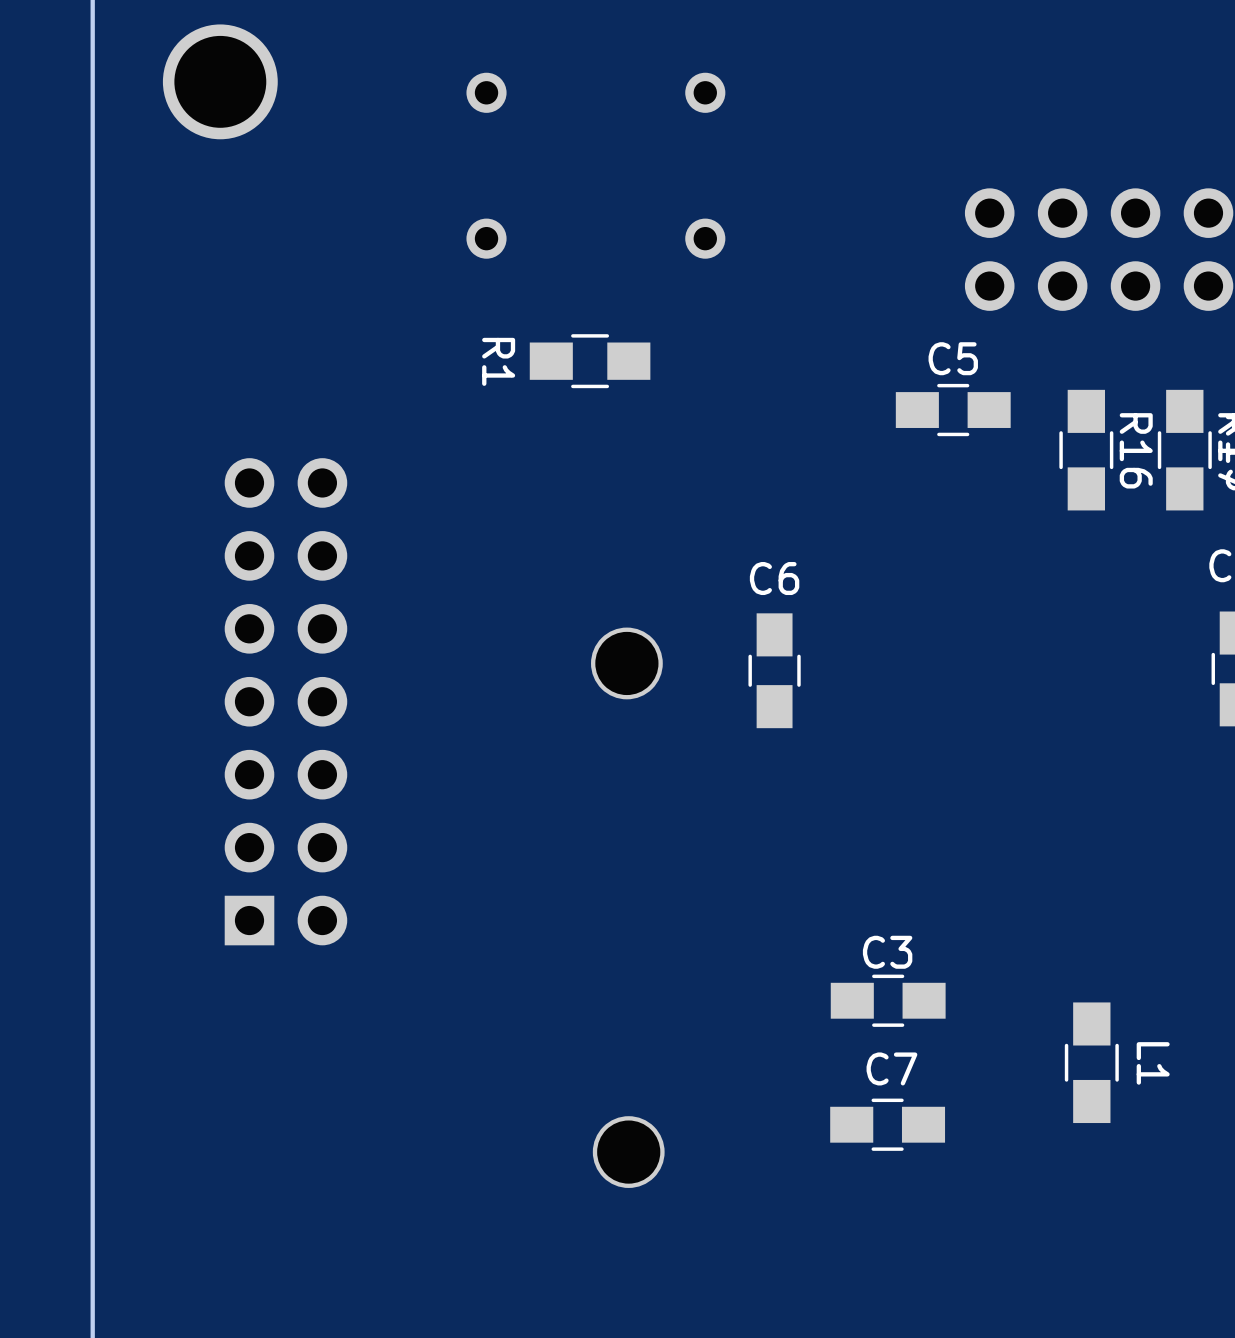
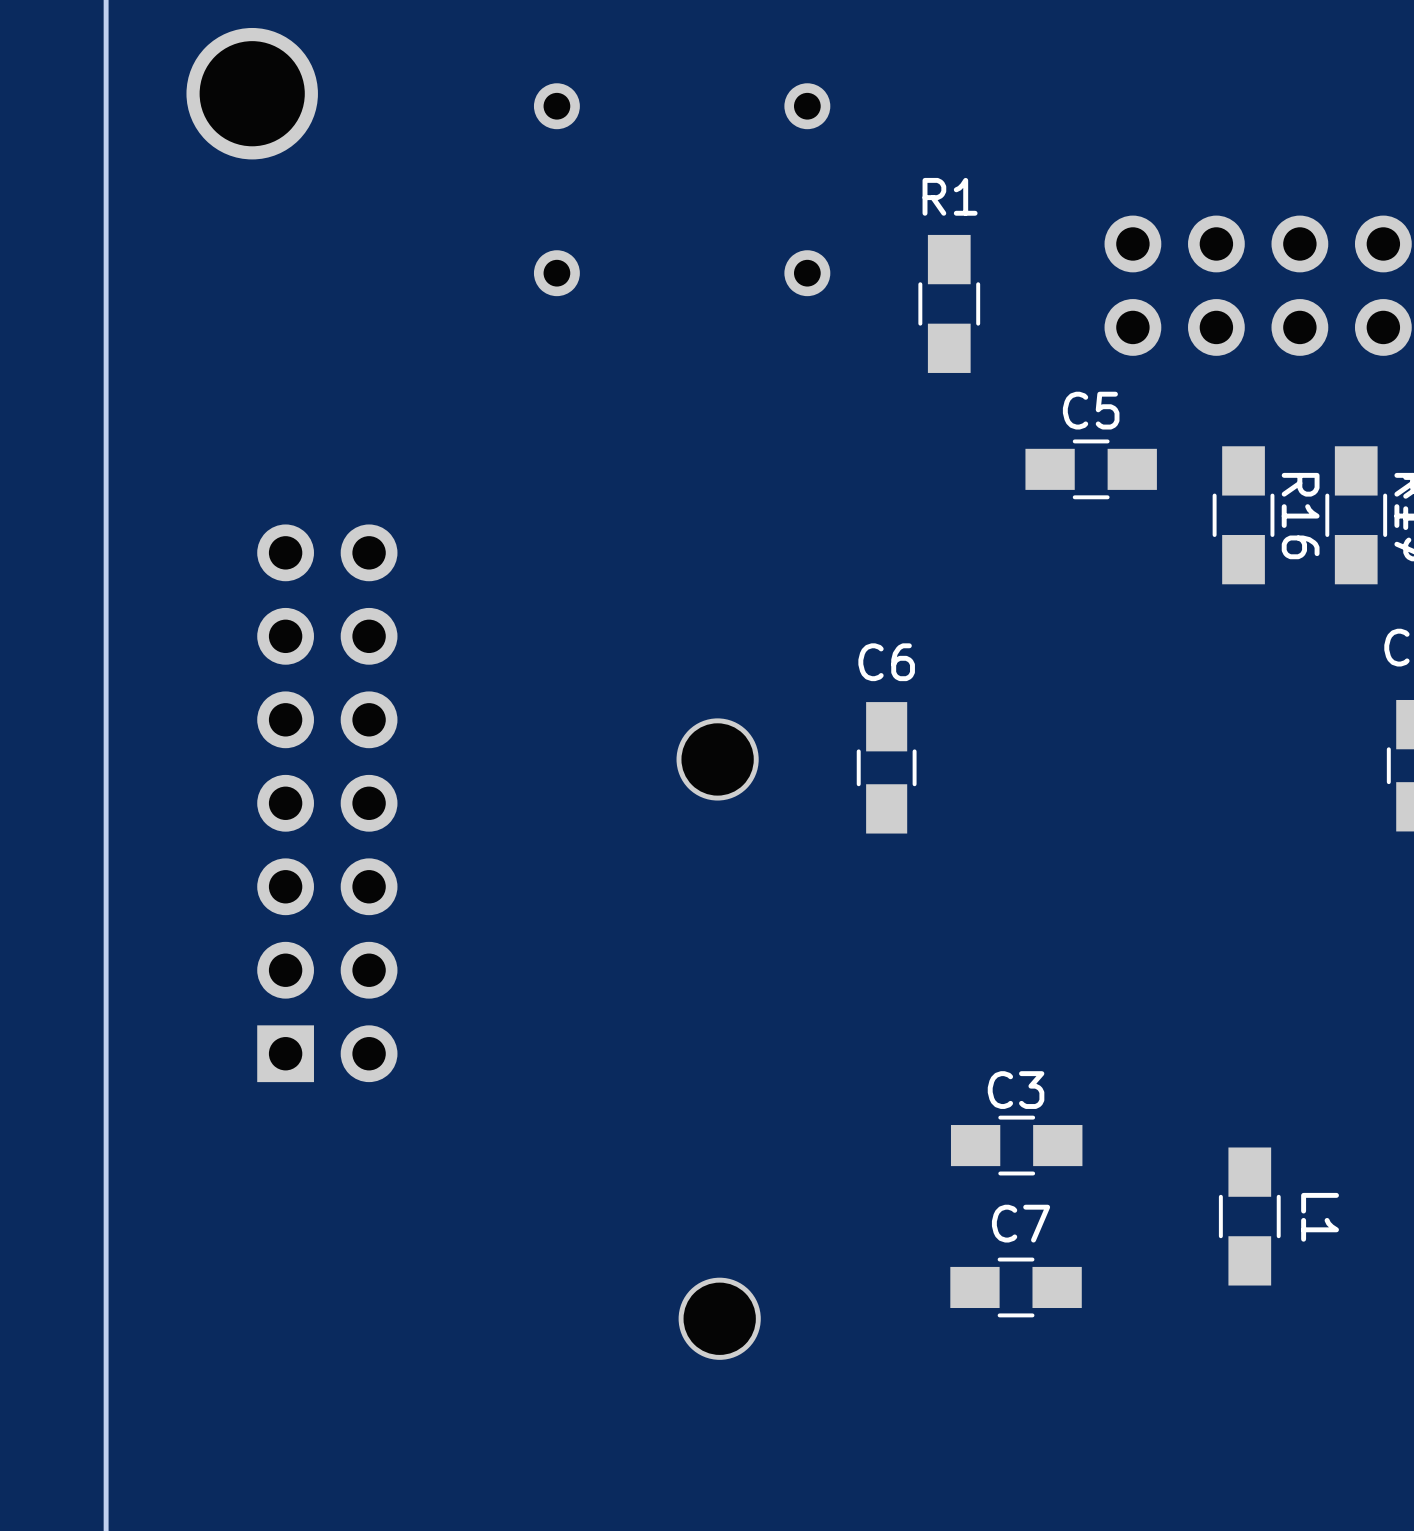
R1 rotation: 0° (590, 361) -> 90° clockwise (949, 303)
R1 position: (590, 361) -> (949, 303)

